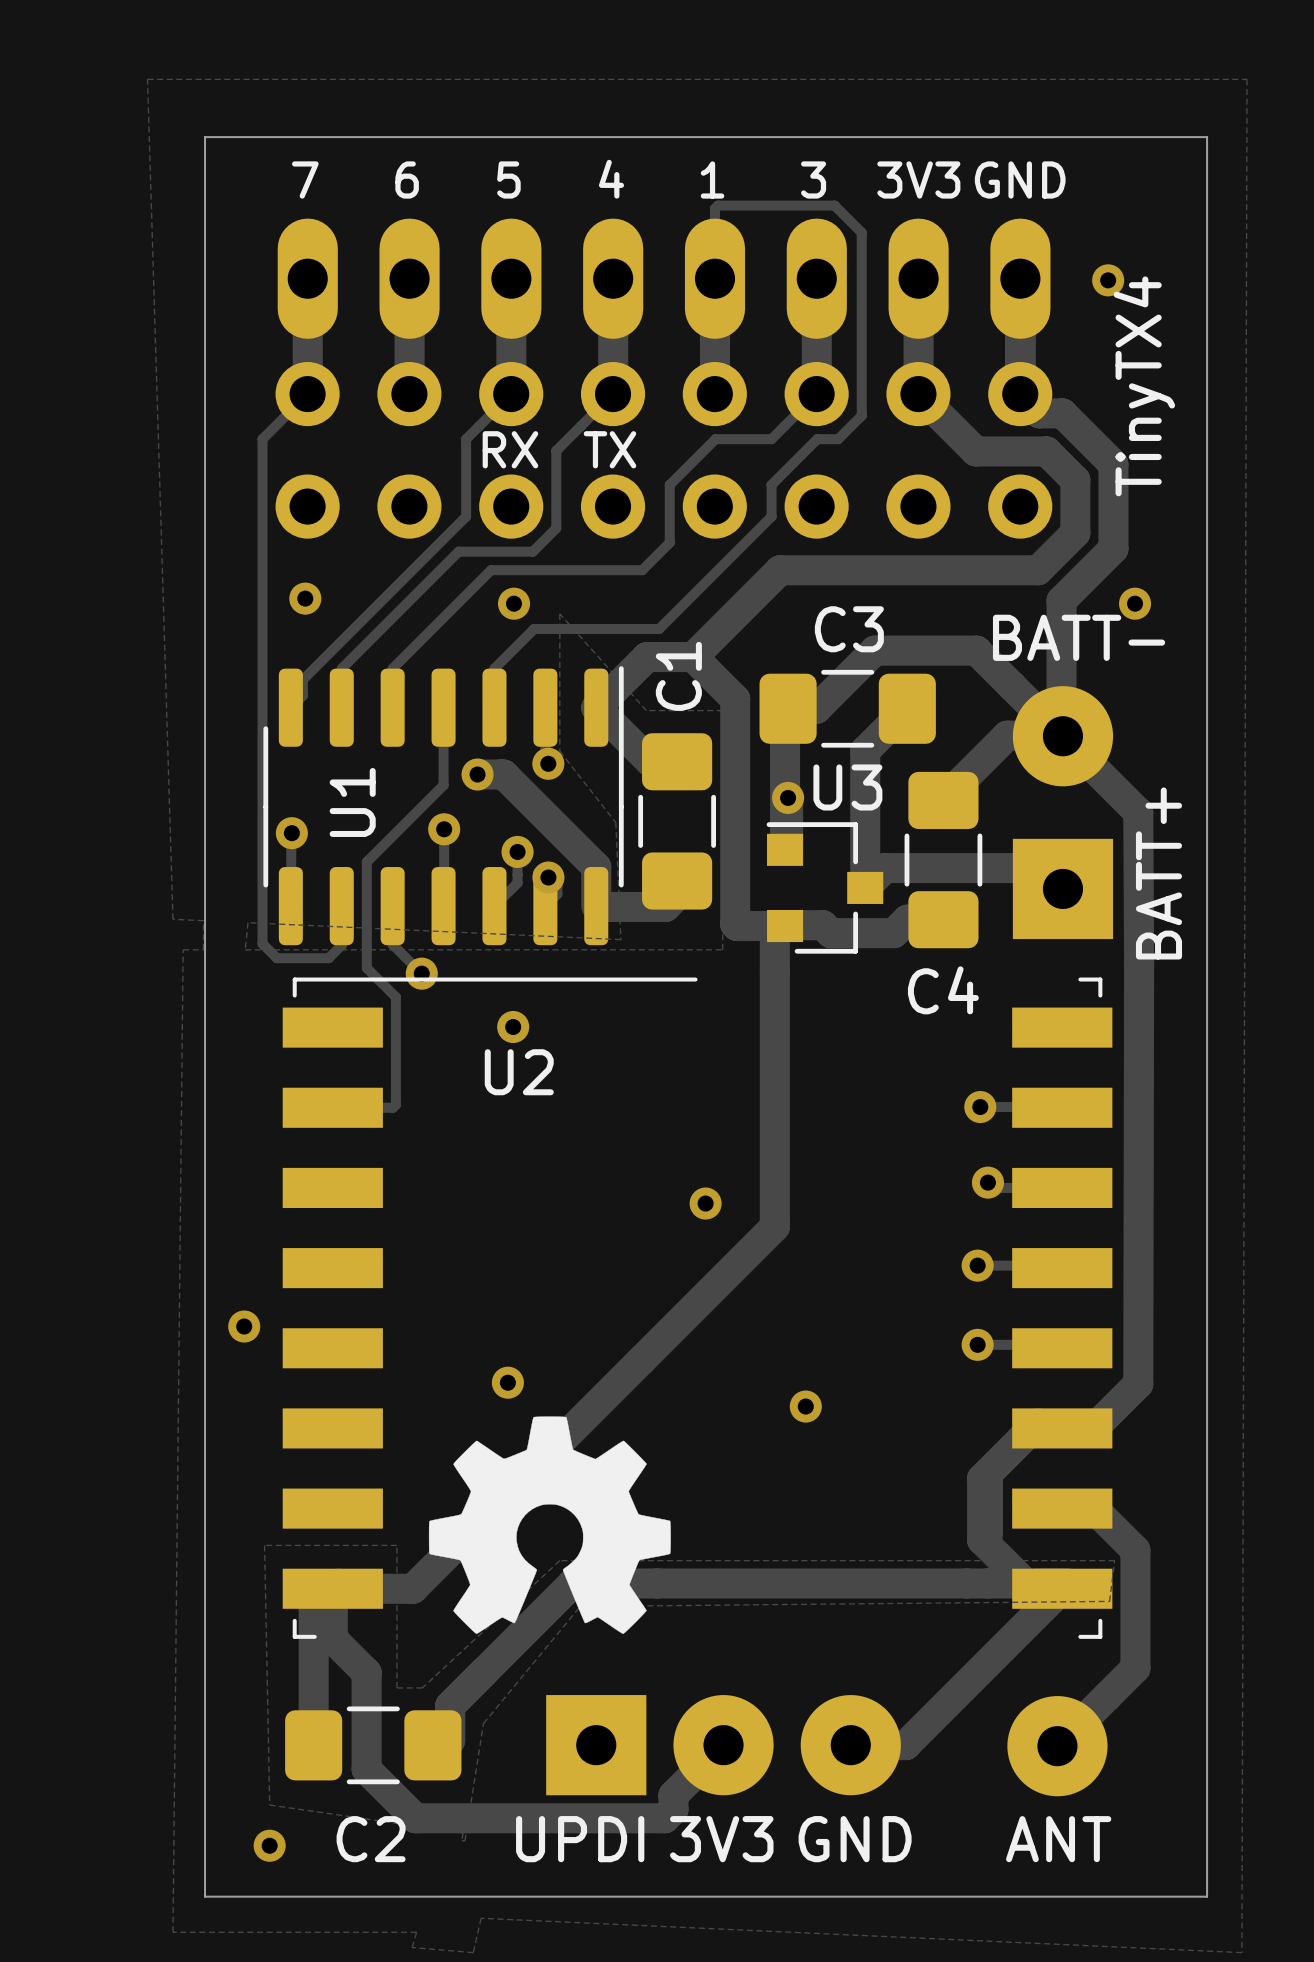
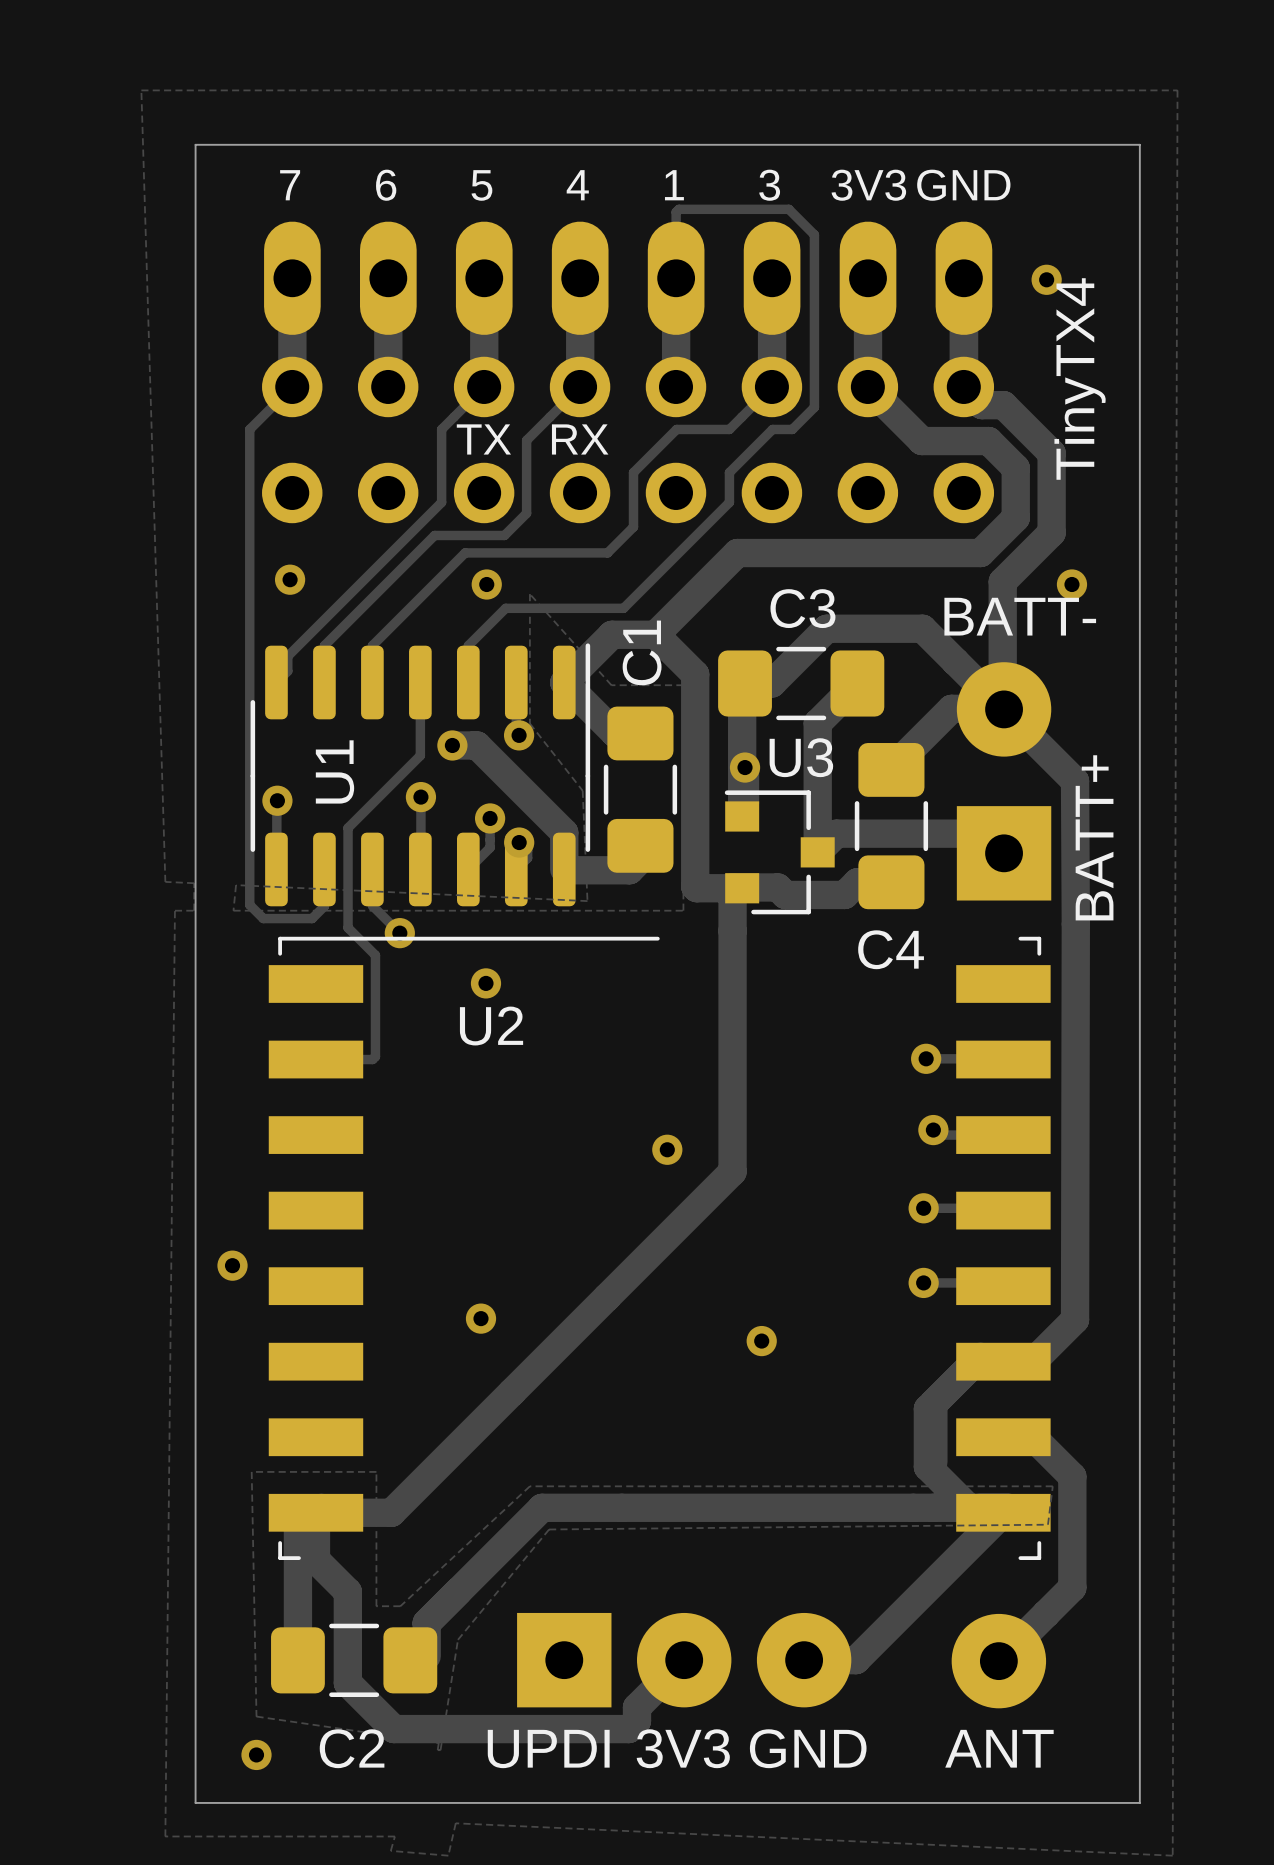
text: RX (510, 449) -> TX (483, 439)
text: TX (609, 449) -> RX (580, 439)
drawing: [428, 1416, 671, 1634] -> none

